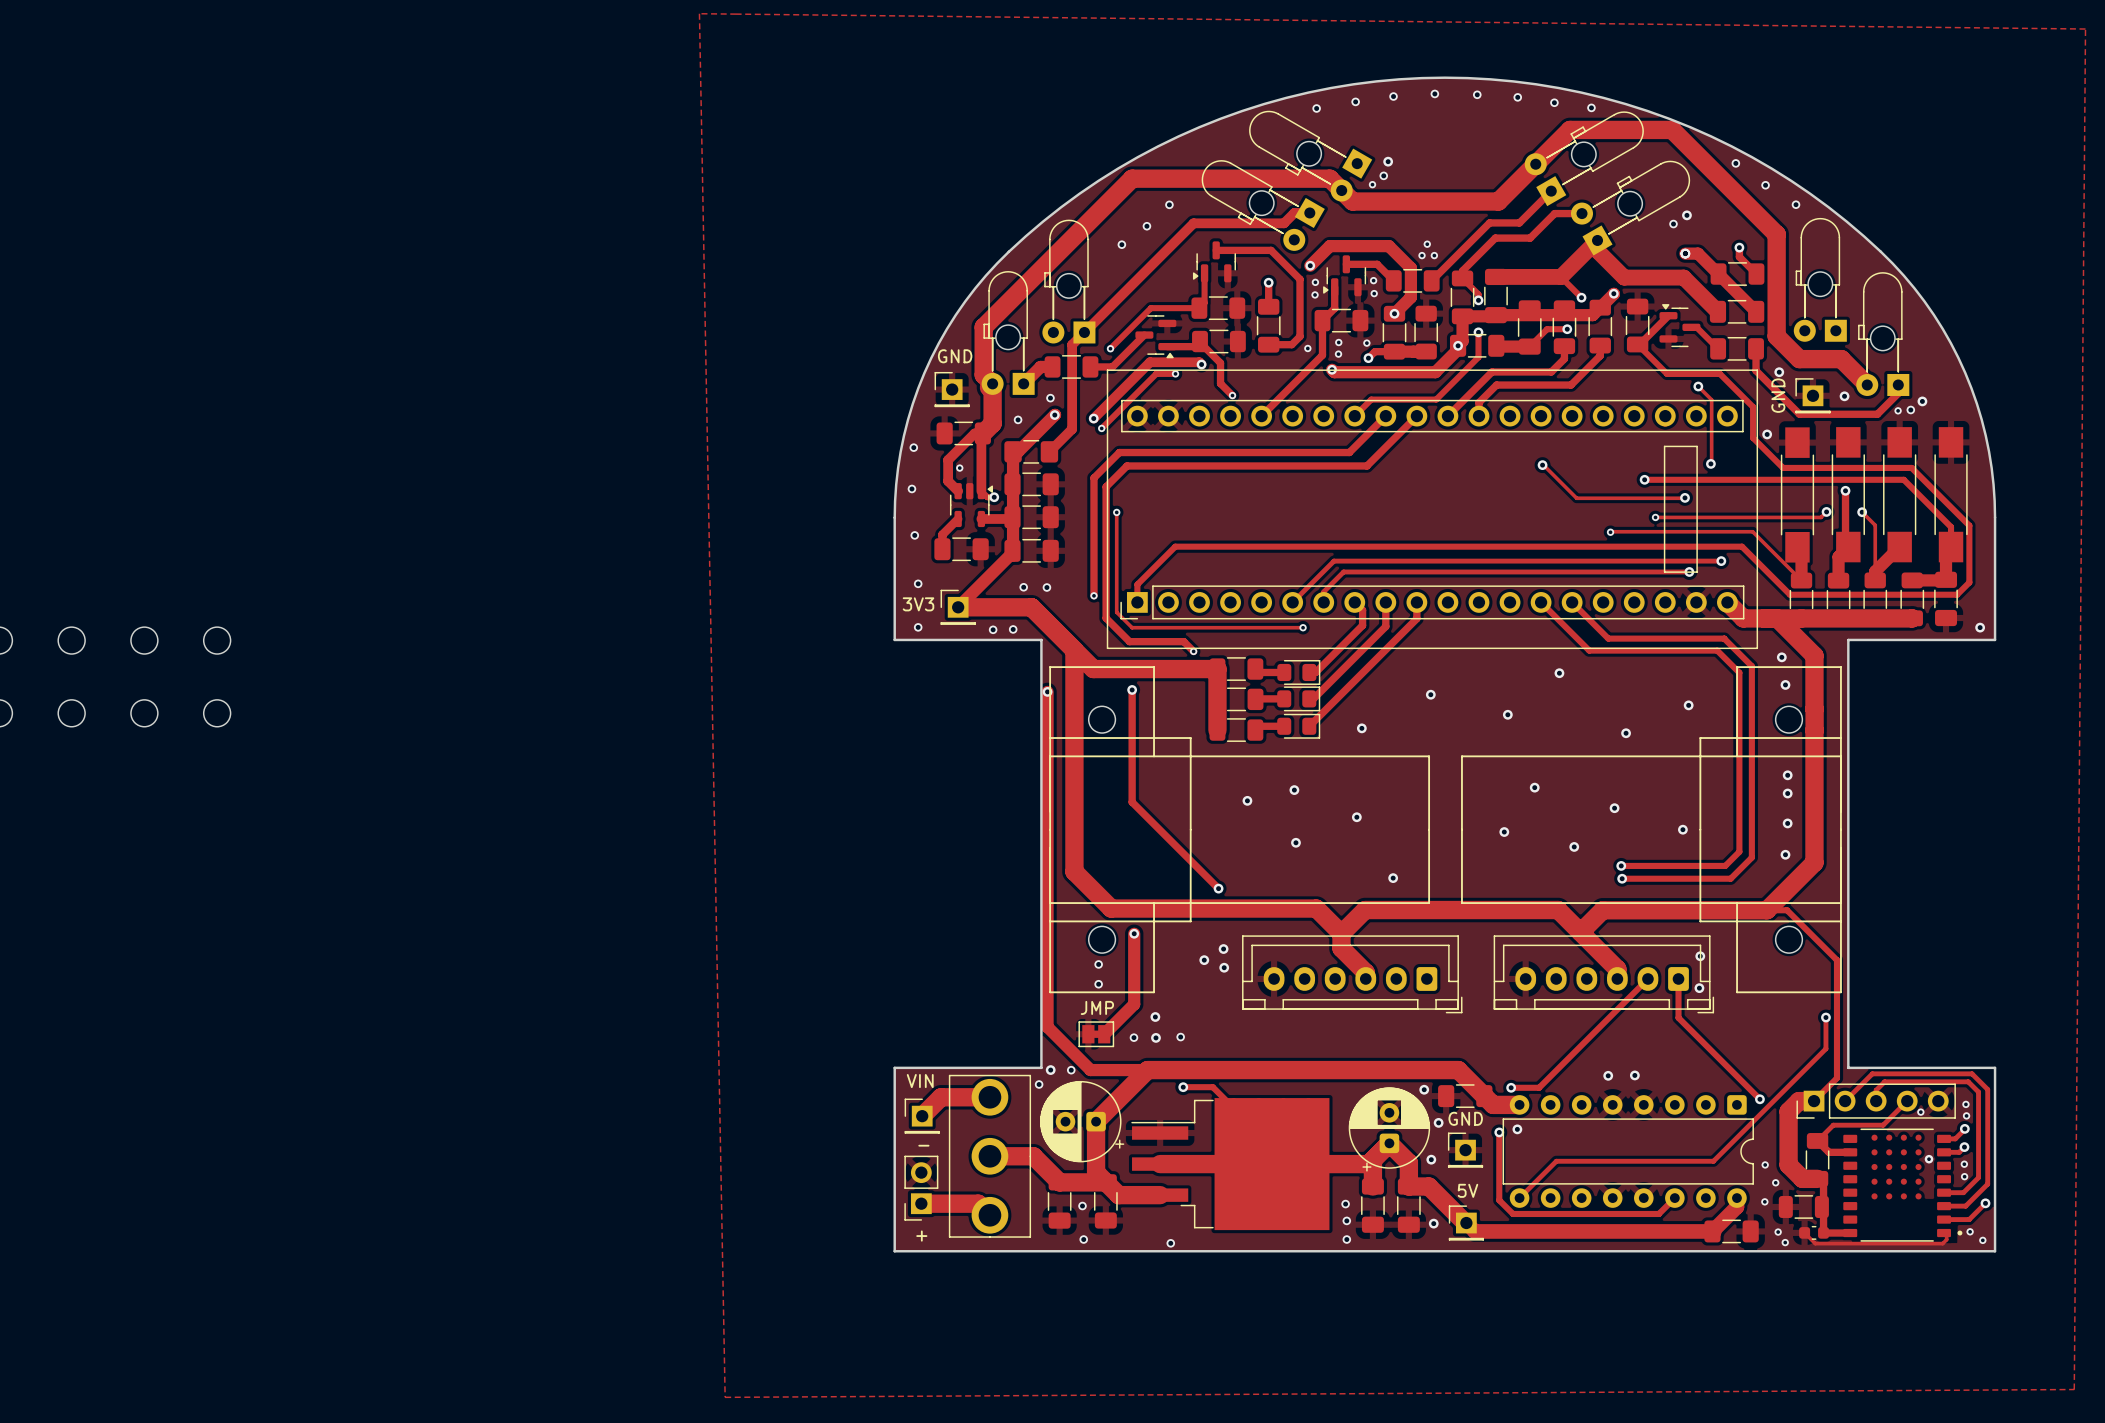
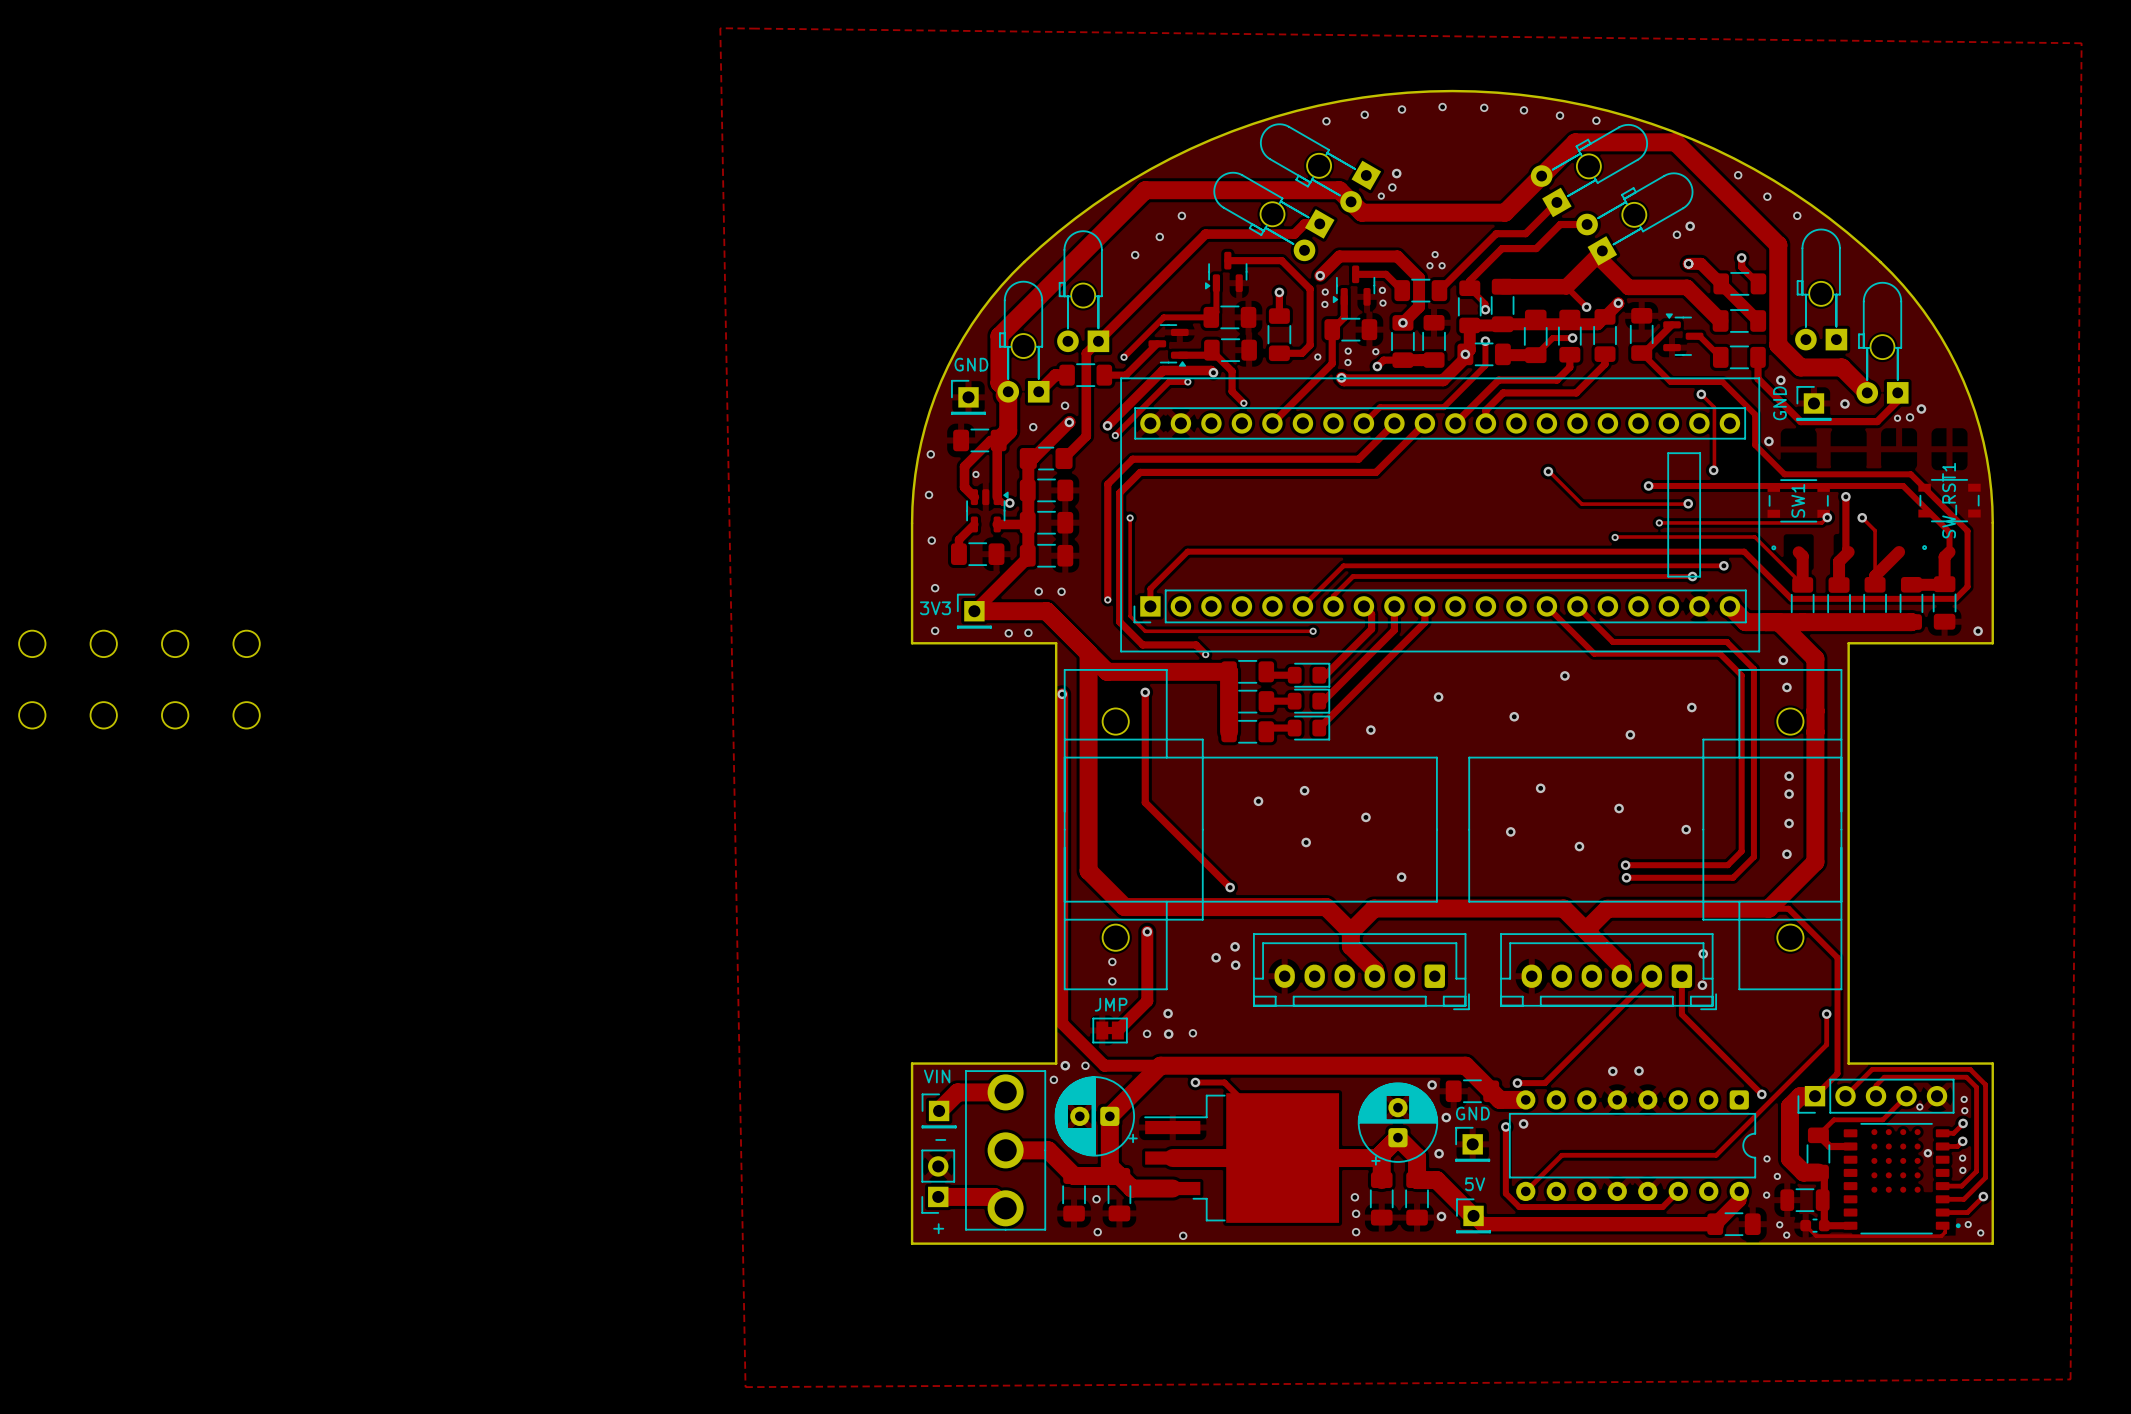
part: (1797, 494) -> none
part: (1848, 494) -> none
part: (1899, 494) -> none
part: (1951, 494) -> none
SW_RST1: none -> (1949, 514)
SW1: none -> (1798, 514)

